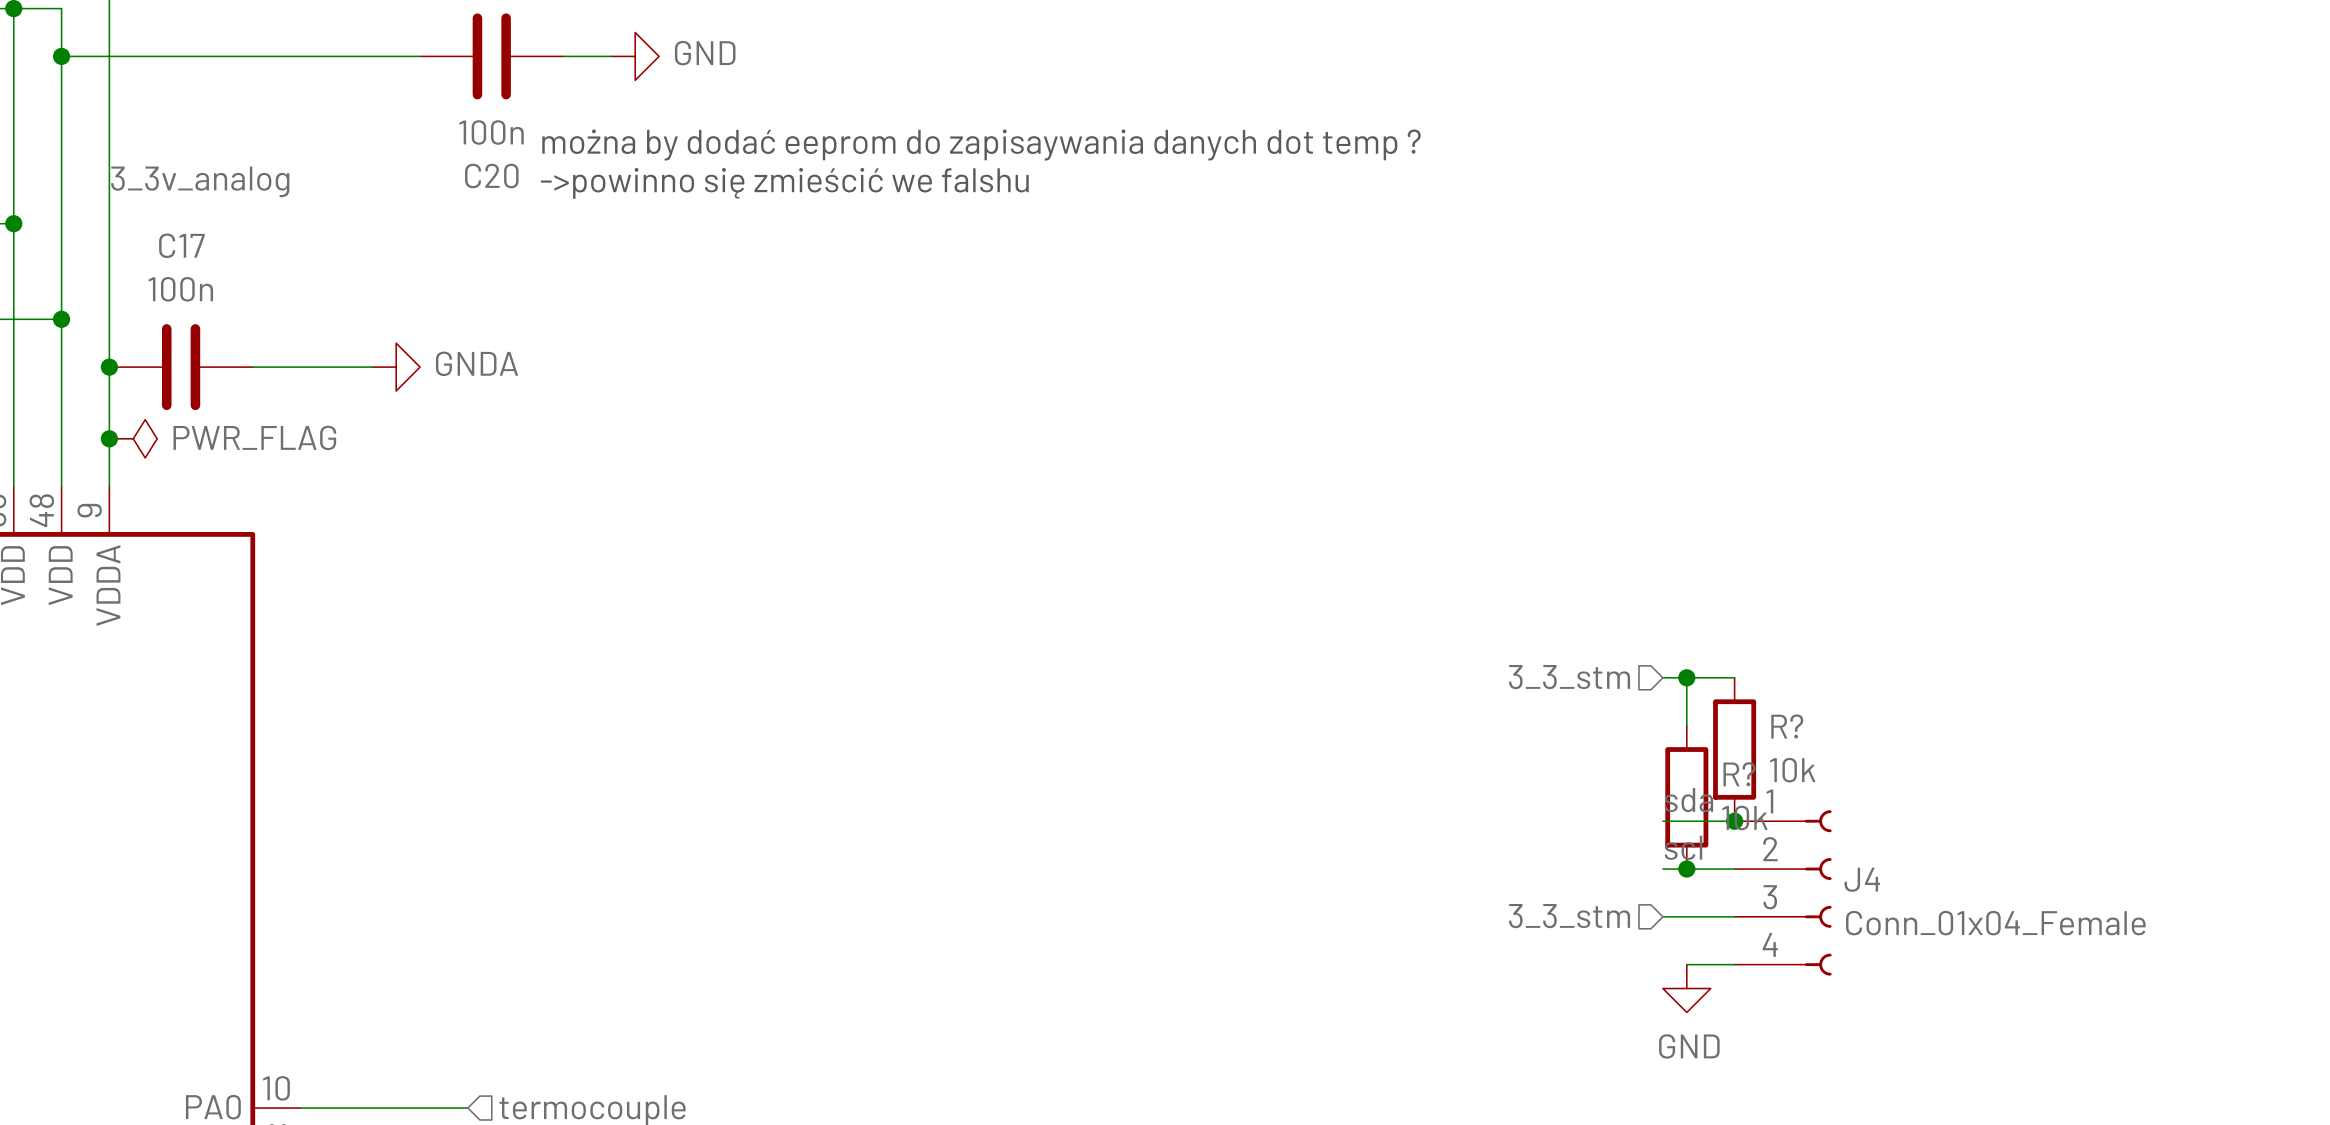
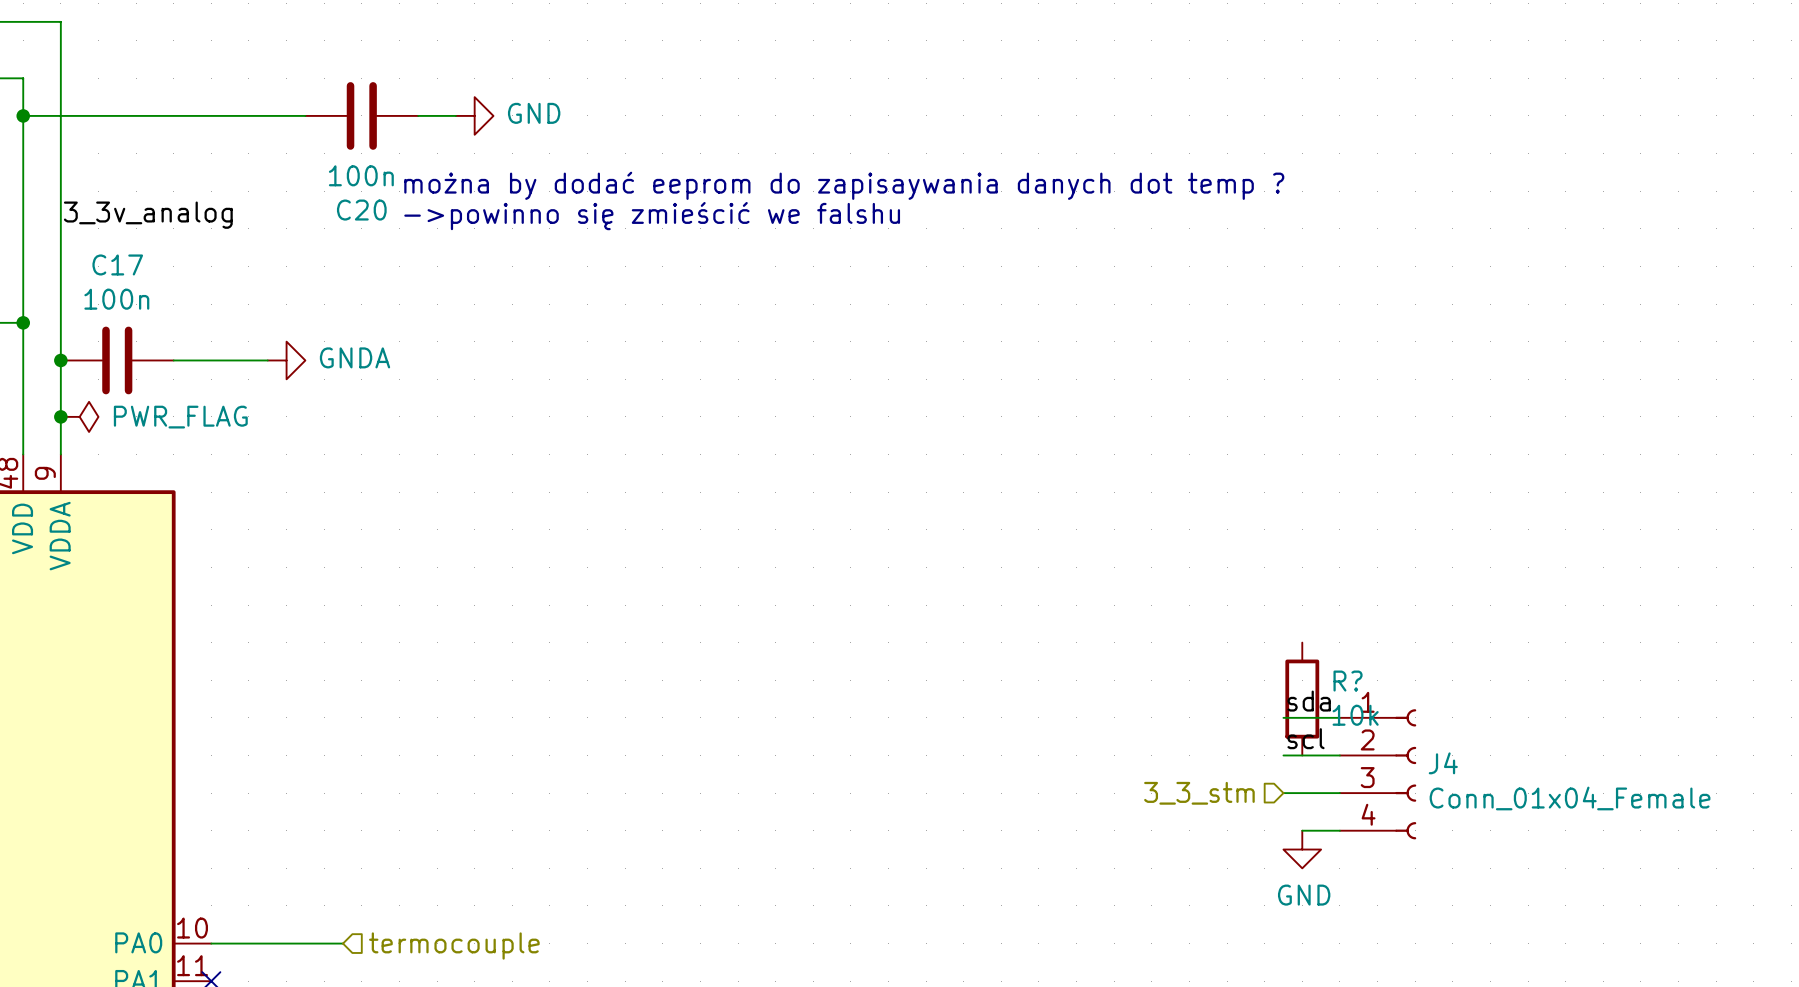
hierarchical label: 3_3_stm (1569, 677) -> none
wire: (1662, 677) (1734, 677) -> none
wire: (1686, 677) (1686, 725) -> none
junction: (1686, 677) -> none
R?: 10k (1734, 749) -> none
junction: (1734, 821) -> none
junction: (1686, 869) -> none

